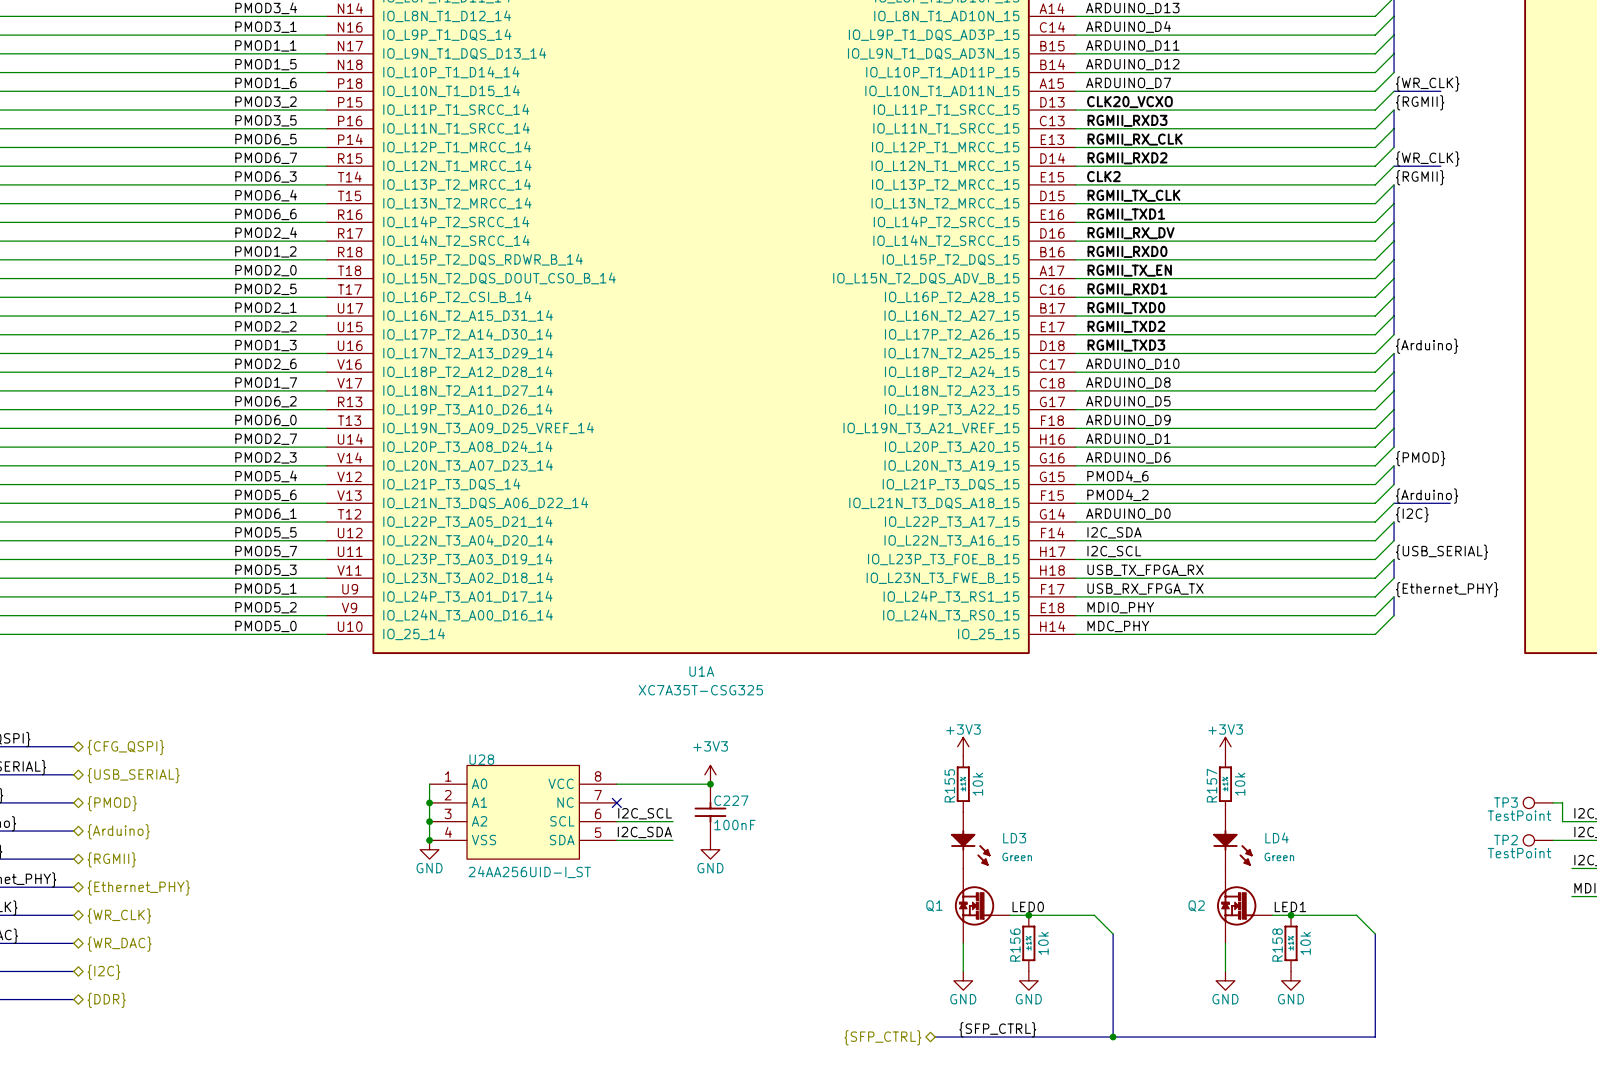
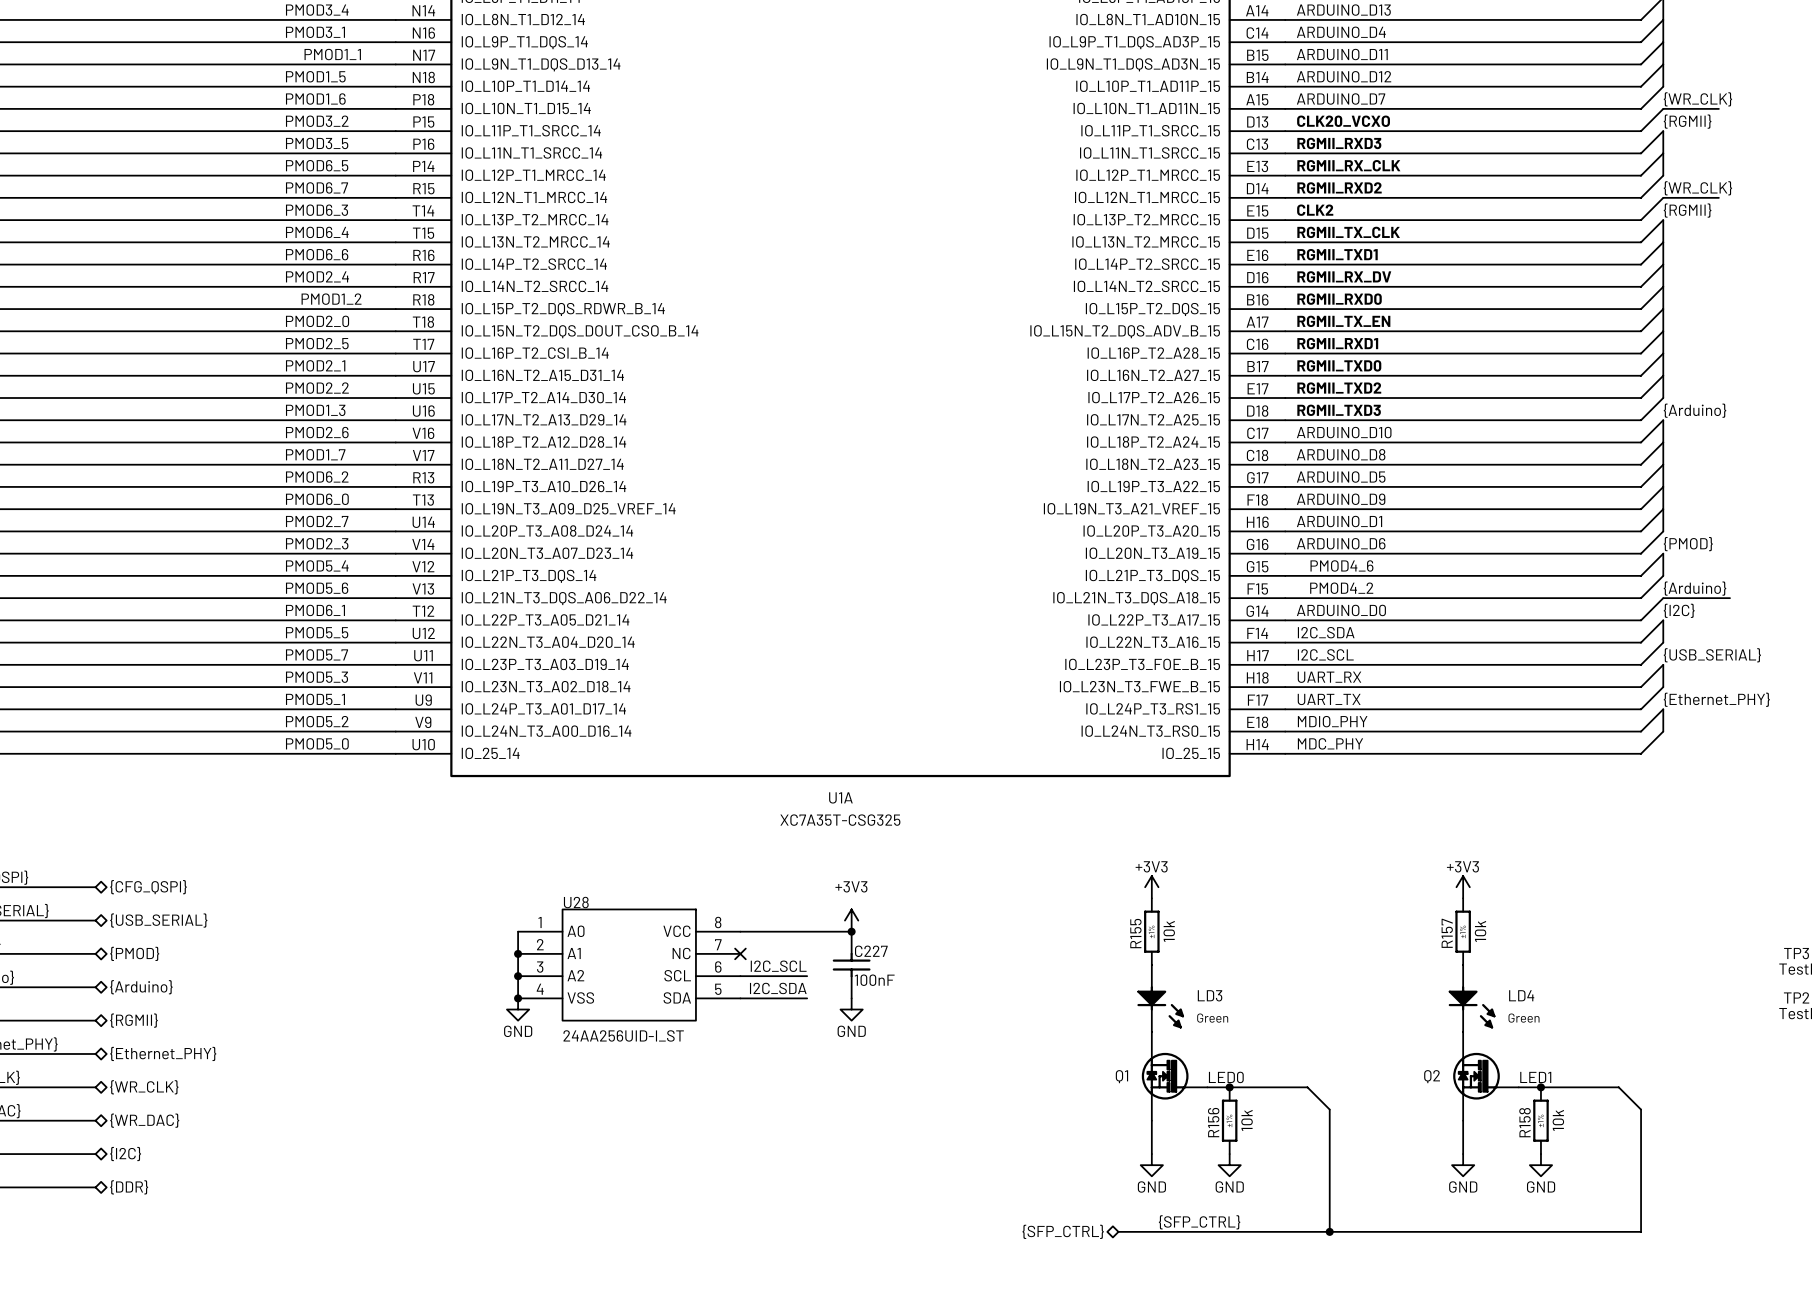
label: USB_TX_FPGA_RX (1145, 570) -> UART_RX (1329, 677)
label: USB_RX_FPGA_TX (1145, 589) -> UART_TX (1329, 699)

